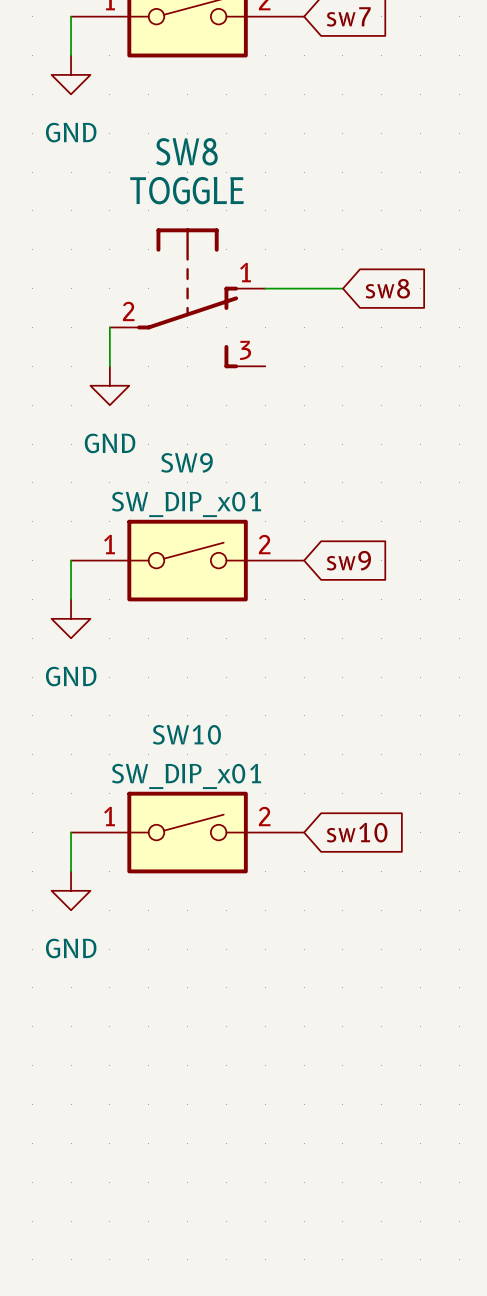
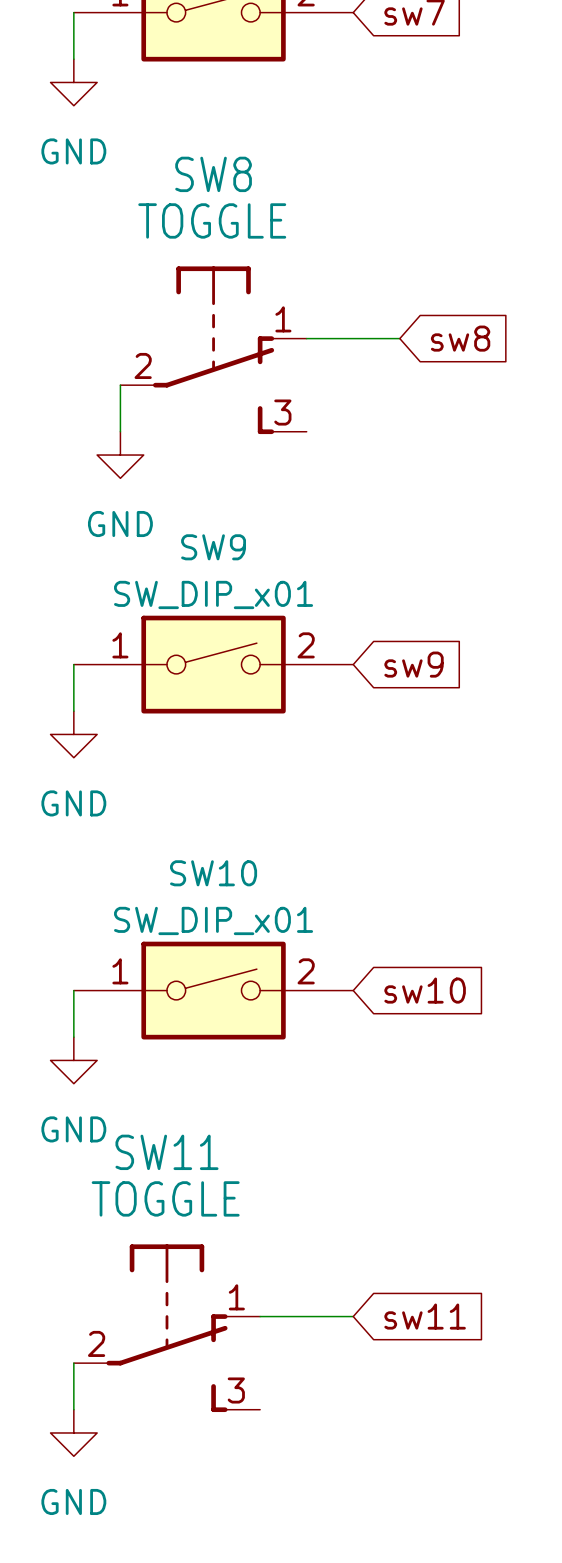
wire: none -> (260, 1316) (353, 1316)
global label: none -> sw11 (425, 1316)
SW11: none -> TOGGLE (166, 1328)
wire: none -> (73, 1363) (73, 1409)
power symbol: none -> GND (73, 1432)

